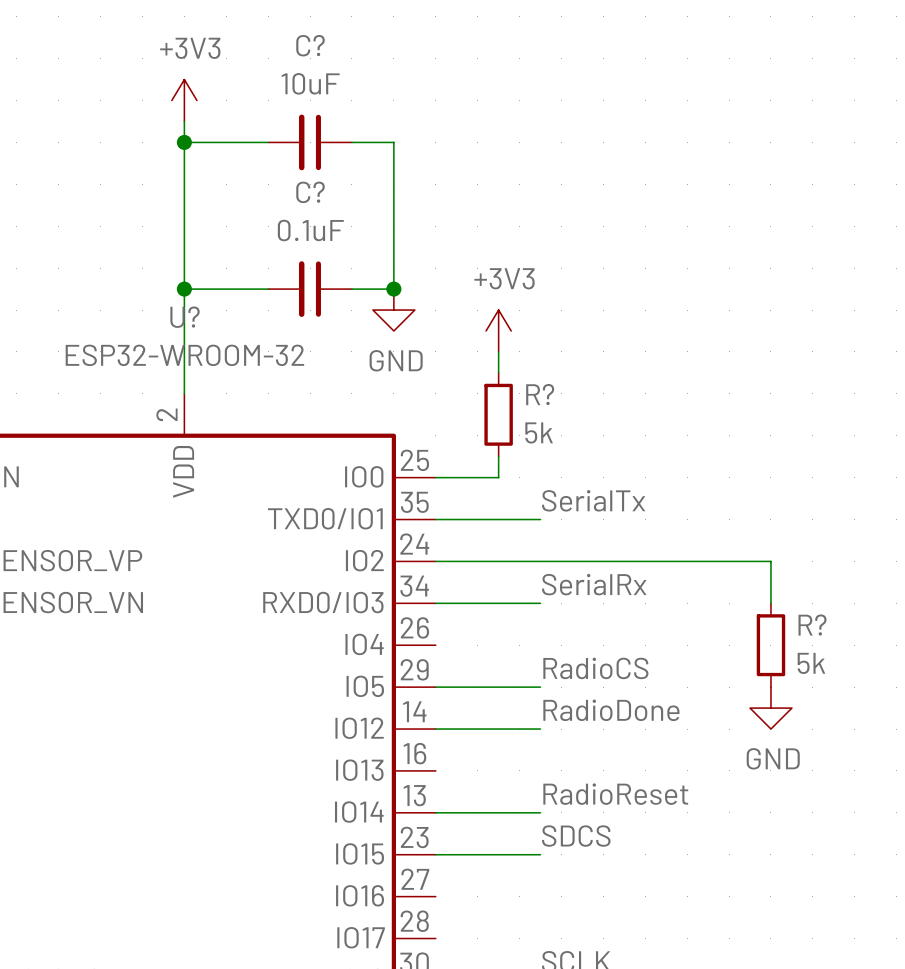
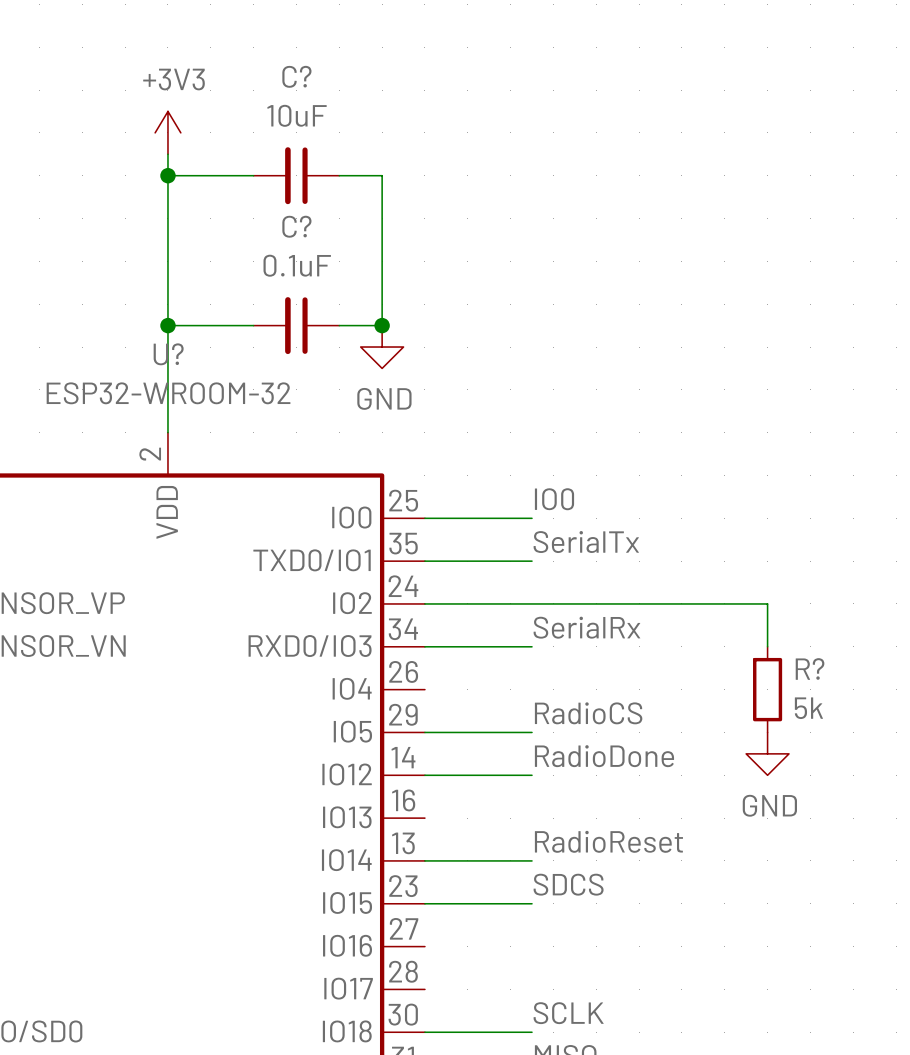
power symbol: +3V3 (498, 330) -> none
wire: (498, 351) (498, 372) -> none
R?: 5k (498, 414) -> none
wire: (498, 456) (498, 477) -> (532, 518) (489, 518)
label: none -> IO0 (554, 499)

